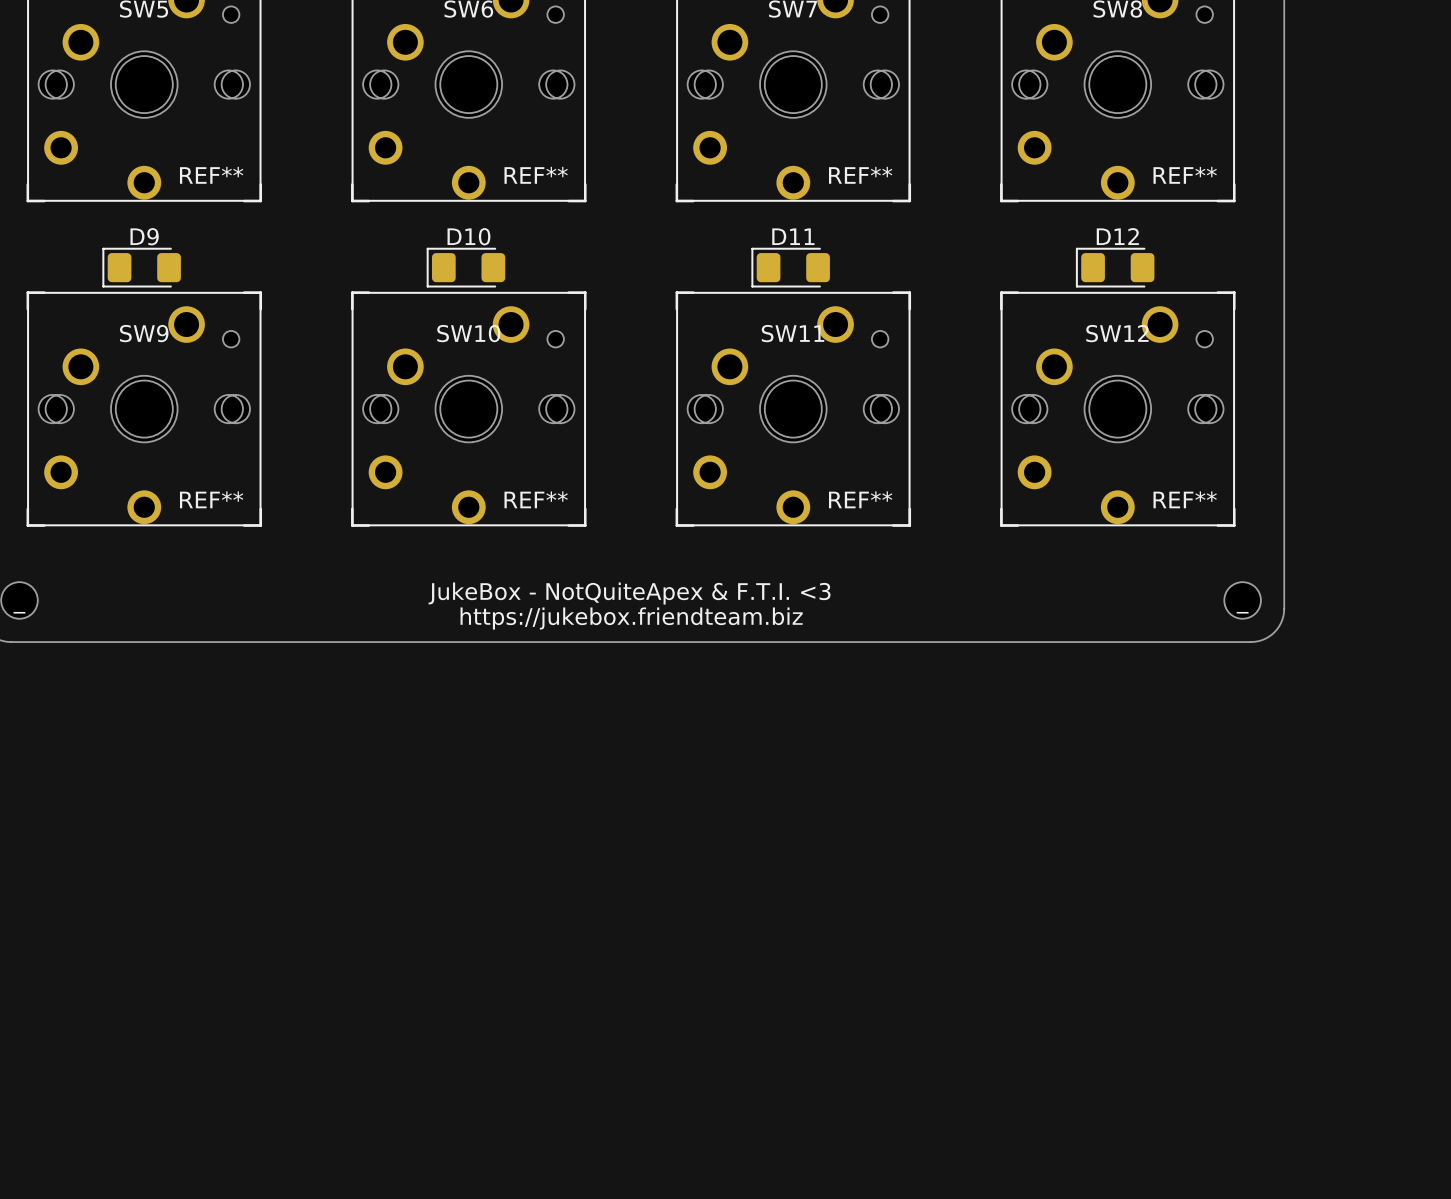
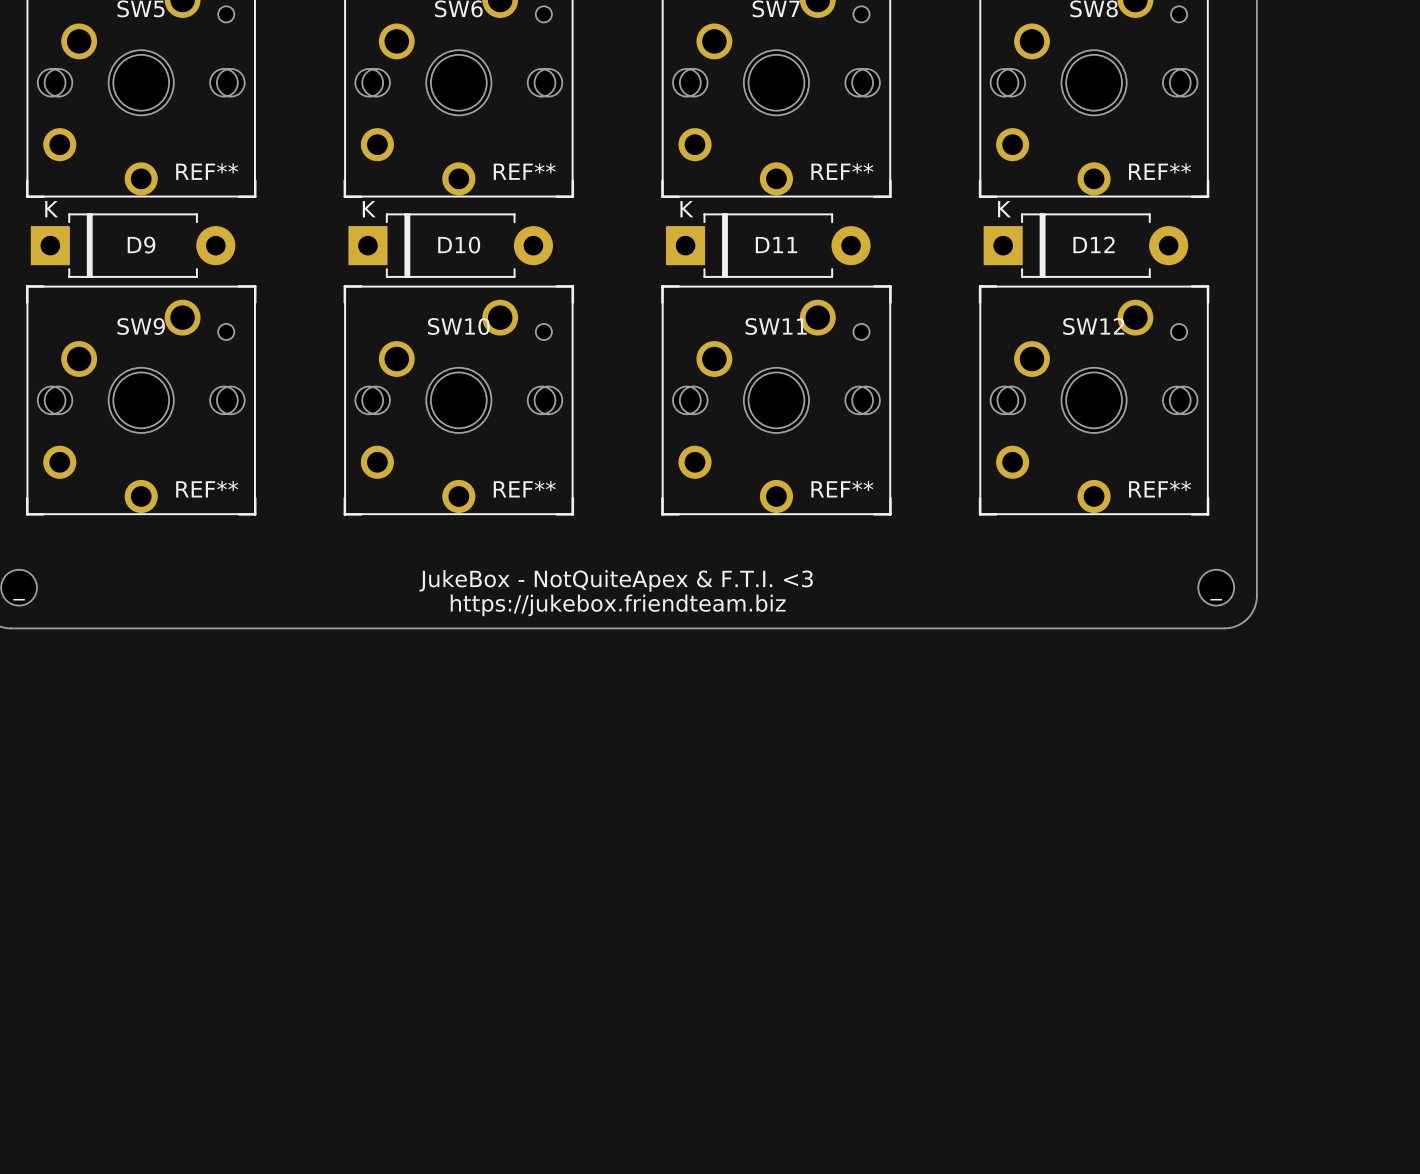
D9 footprint: [102, 247, 181, 288] -> [30, 213, 236, 278]
D10 footprint: [426, 247, 506, 288] -> [348, 213, 553, 278]
D11 footprint: [751, 247, 830, 288] -> [666, 213, 871, 278]
D12 footprint: [1075, 247, 1155, 288] -> [983, 213, 1189, 278]

